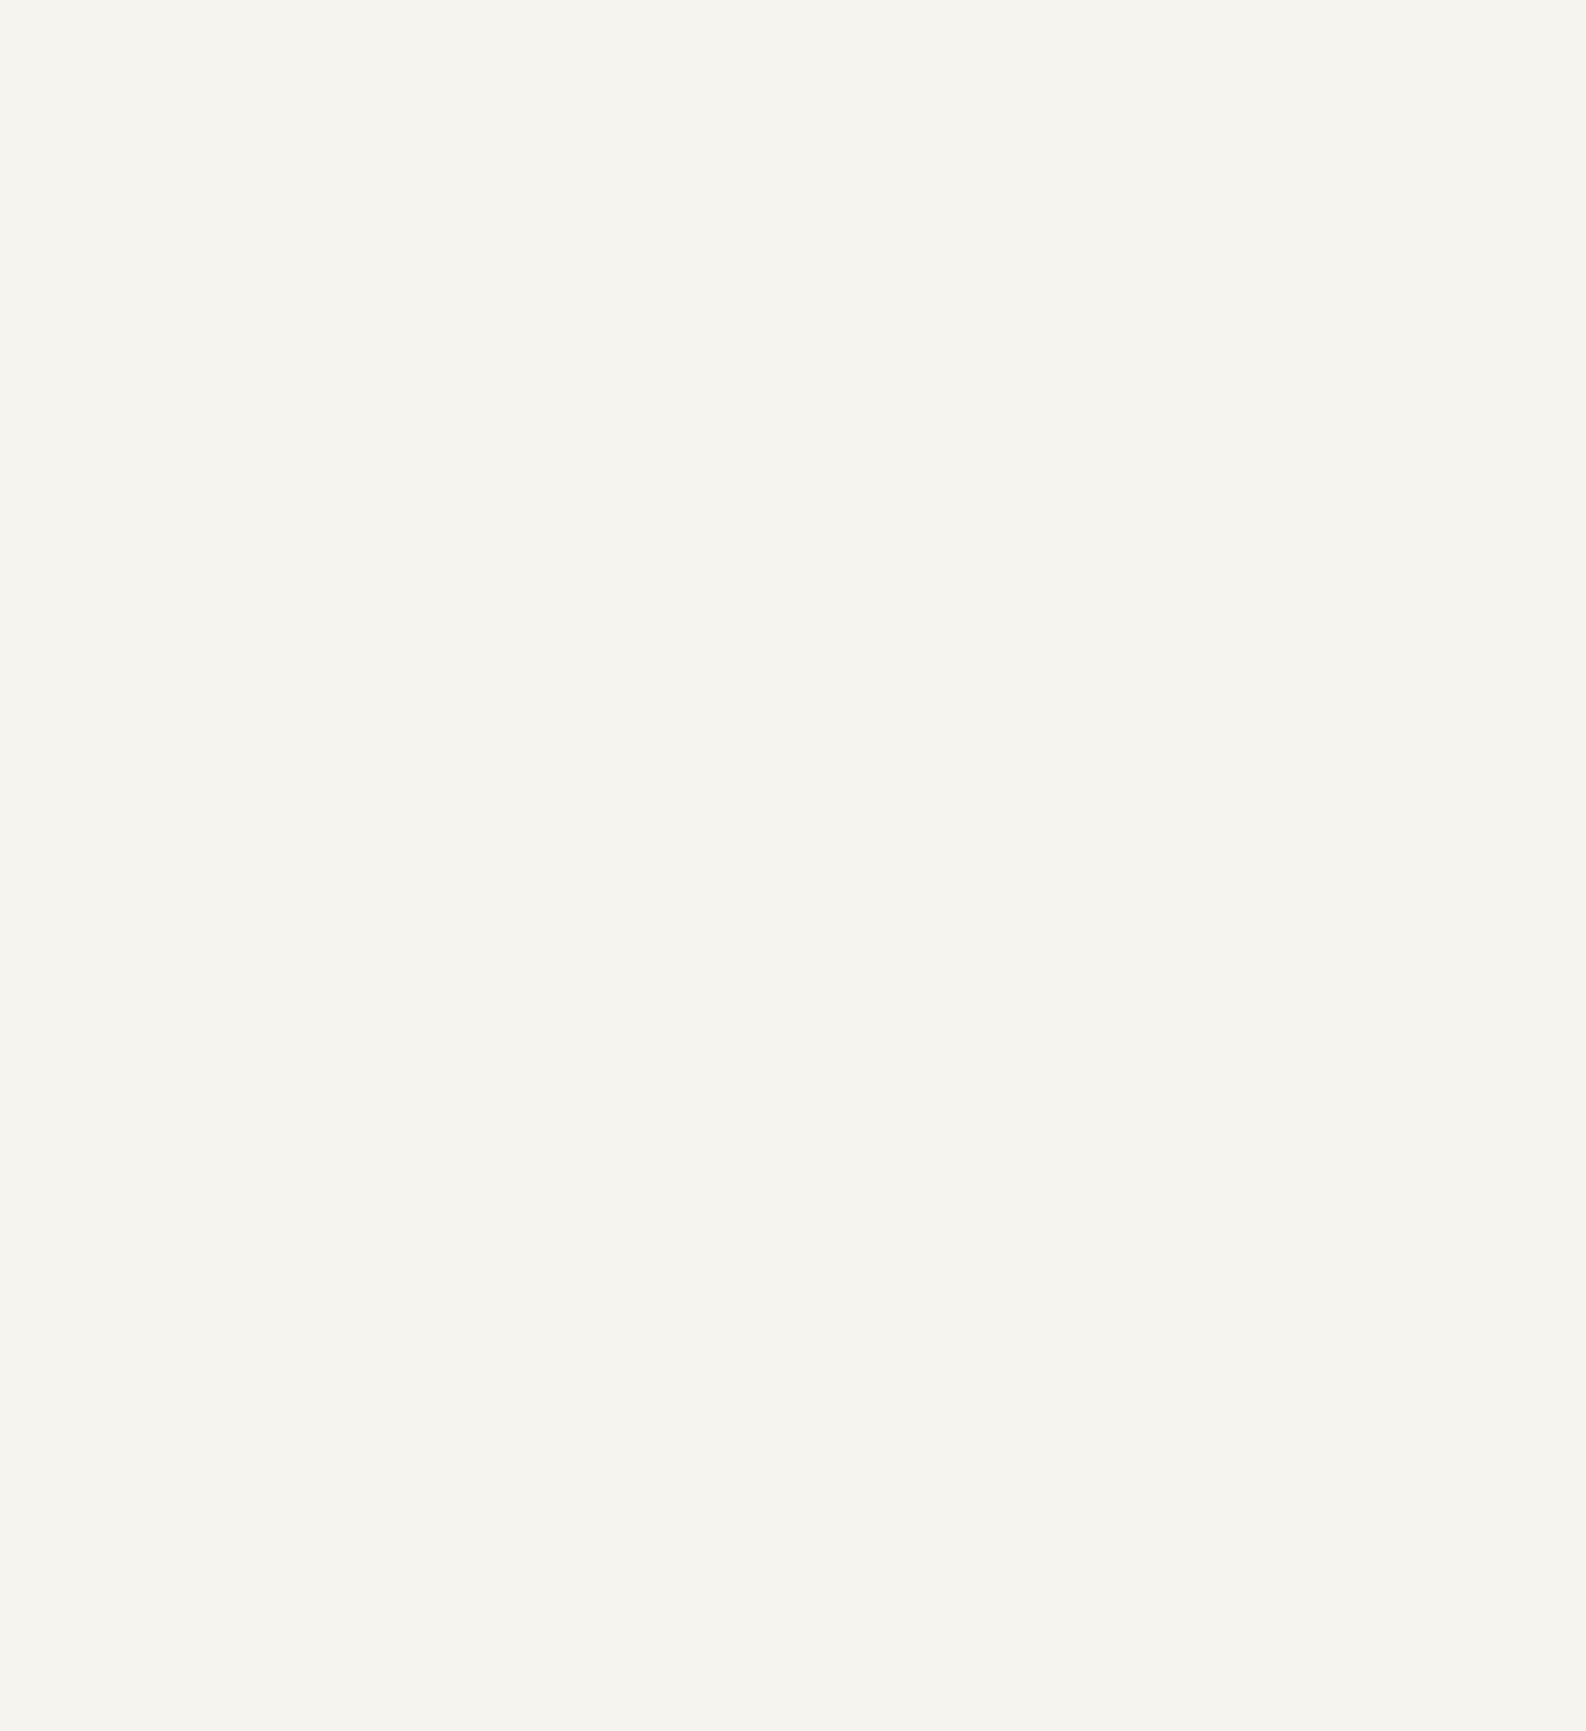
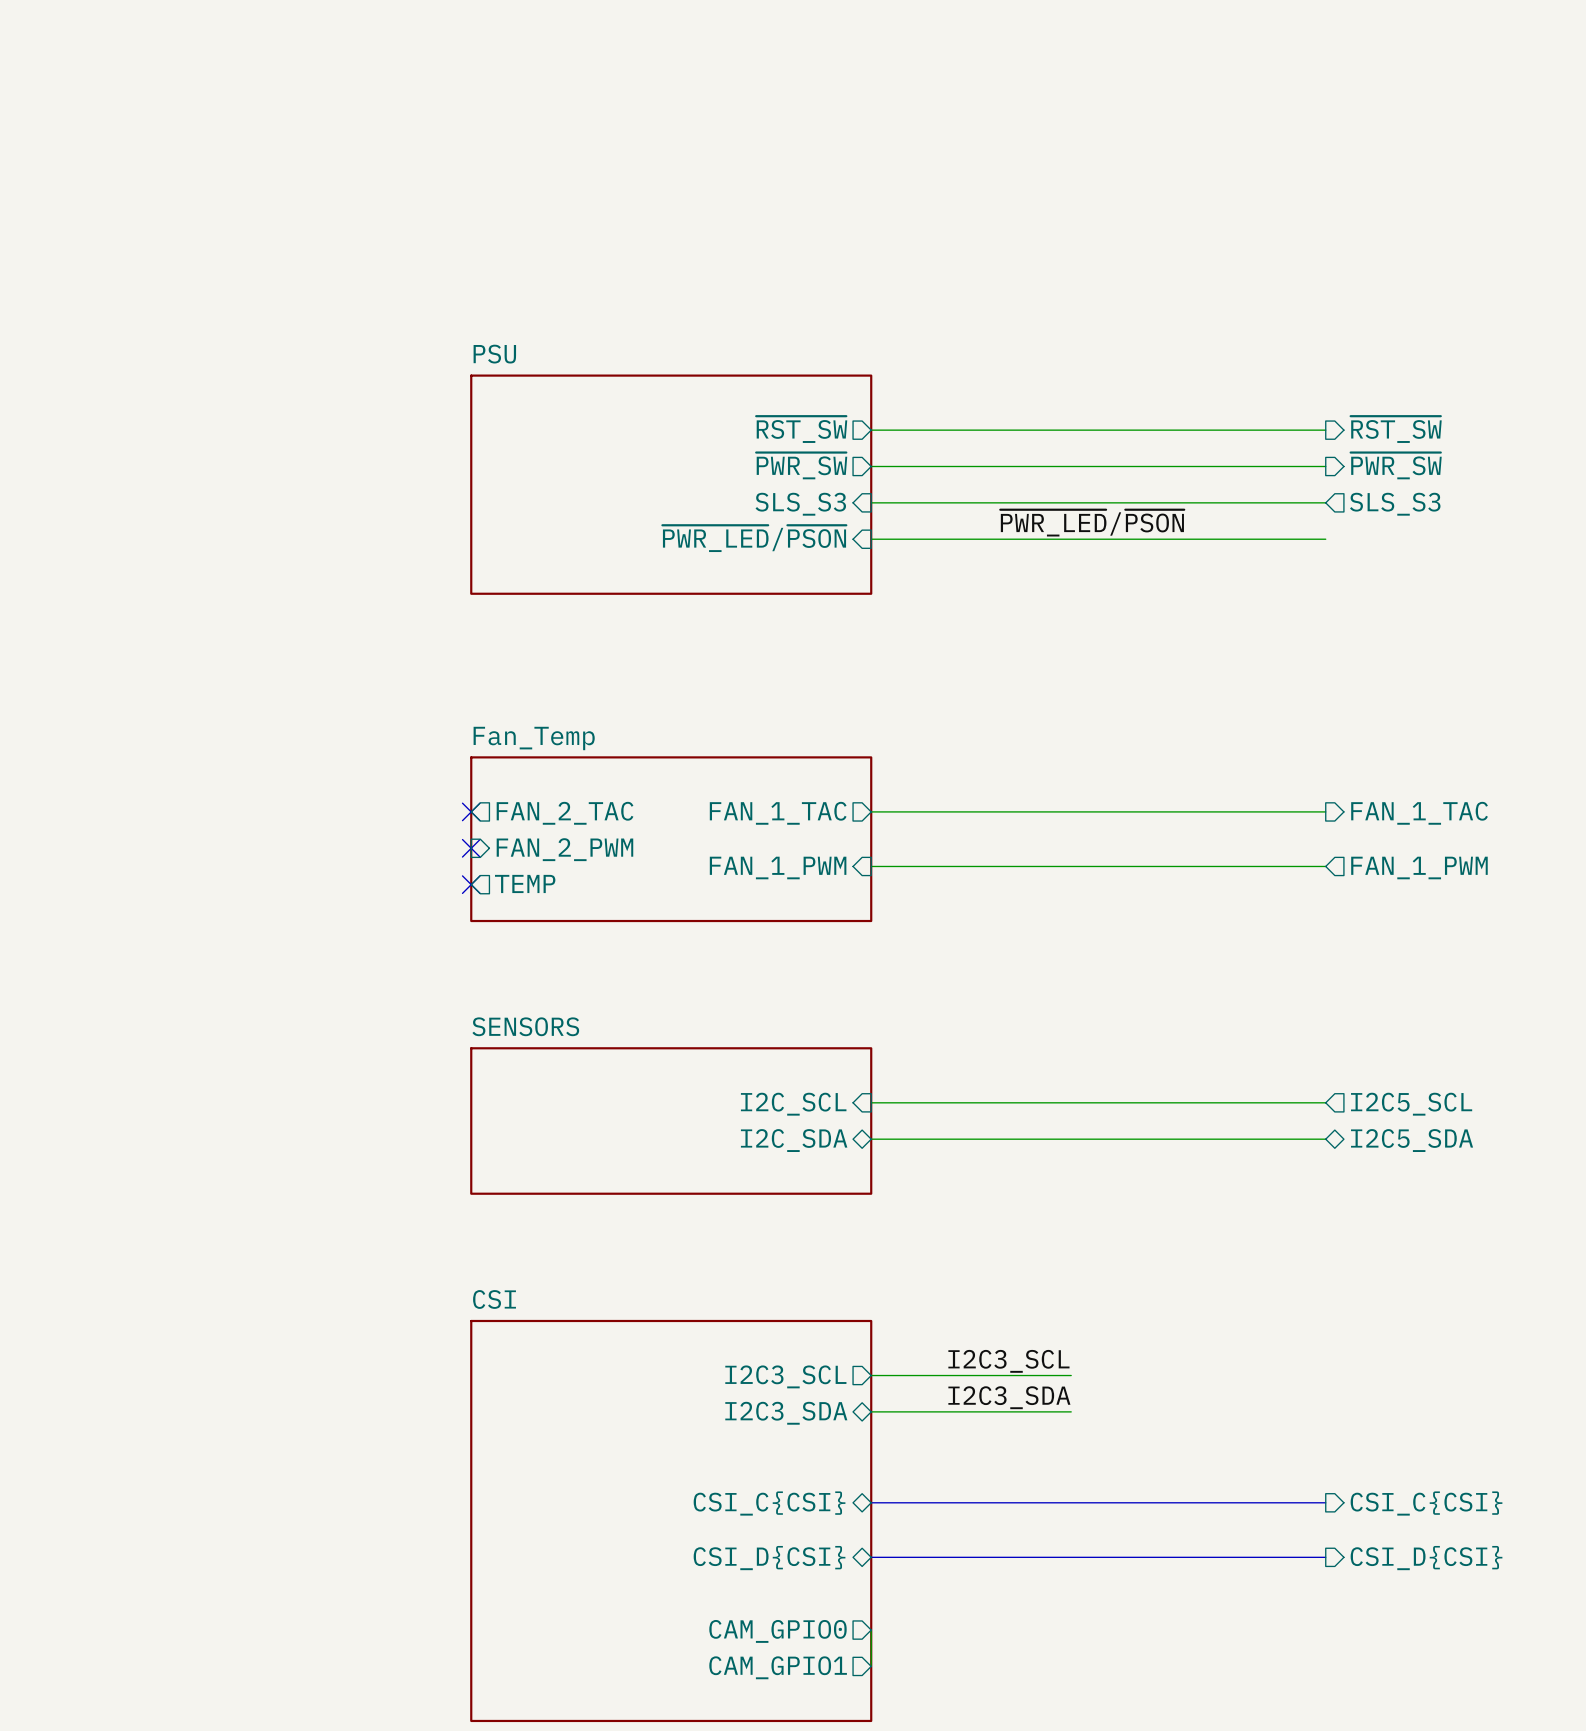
sheet pin: none -> ~{RST_SW} (801, 429)
sheet pin: none -> ~{RST_SW} (1396, 429)
wire: none -> (871, 430) (1325, 430)
sheet pin: none -> ~{PWR_SW} (801, 465)
sheet pin: none -> ~{PWR_SW} (1396, 465)
wire: none -> (871, 466) (1325, 466)
sheet PSU: none -> (671, 484)
wire: none -> (871, 502) (1325, 502)
sheet pin: none -> SLS_S3 (800, 504)
sheet pin: none -> SLS_S3 (1395, 504)
label: none -> ~{PWR_LED}/~{PSON} (1092, 523)
sheet pin: none -> ~{PWR_LED}/~{PSON} (754, 538)
wire: none -> (871, 539) (1325, 539)
no-connect mark: none -> (471, 811)
wire: none -> (871, 811) (1325, 811)
sheet pin: none -> FAN_2_TAC (565, 813)
sheet pin: none -> FAN_1_TAC (778, 813)
sheet pin: none -> FAN_1_TAC (1419, 813)
sheet Fan_Temp: none -> (671, 839)
no-connect mark: none -> (471, 848)
sheet pin: none -> FAN_2_PWM (564, 849)
wire: none -> (871, 866) (1325, 866)
sheet pin: none -> FAN_1_PWM (778, 867)
sheet pin: none -> FAN_1_PWM (1419, 867)
sheet pin: none -> TEMP (525, 883)
no-connect mark: none -> (471, 884)
wire: none -> (871, 1102) (1325, 1102)
sheet pin: none -> I2C_SCL (793, 1104)
sheet pin: none -> I2C5_SCL (1411, 1104)
sheet SENSORS: none -> (671, 1121)
wire: none -> (871, 1139) (1325, 1139)
sheet pin: none -> I2C_SDA (794, 1140)
sheet pin: none -> I2C5_SDA (1412, 1140)
label: none -> I2C3_SCL (1008, 1361)
wire: none -> (871, 1375) (1071, 1375)
sheet pin: none -> I2C3_SCL (785, 1376)
label: none -> I2C3_SDA (1009, 1397)
wire: none -> (871, 1411) (1071, 1411)
sheet pin: none -> I2C3_SDA (786, 1413)
bus: none -> (871, 1502) (1325, 1502)
sheet pin: none -> CSI_C{CSI} (769, 1503)
sheet pin: none -> CSI_C{CSI} (1426, 1503)
sheet CSI: none -> (671, 1520)
bus: none -> (871, 1557) (1325, 1557)
sheet pin: none -> CSI_D{CSI} (769, 1558)
sheet pin: none -> CSI_D{CSI} (1426, 1558)
wire: none -> (871, 1630) (871, 1666)
sheet pin: none -> CAM_GPIO0 (777, 1631)
sheet pin: none -> CAM_GPIO1 (778, 1667)

